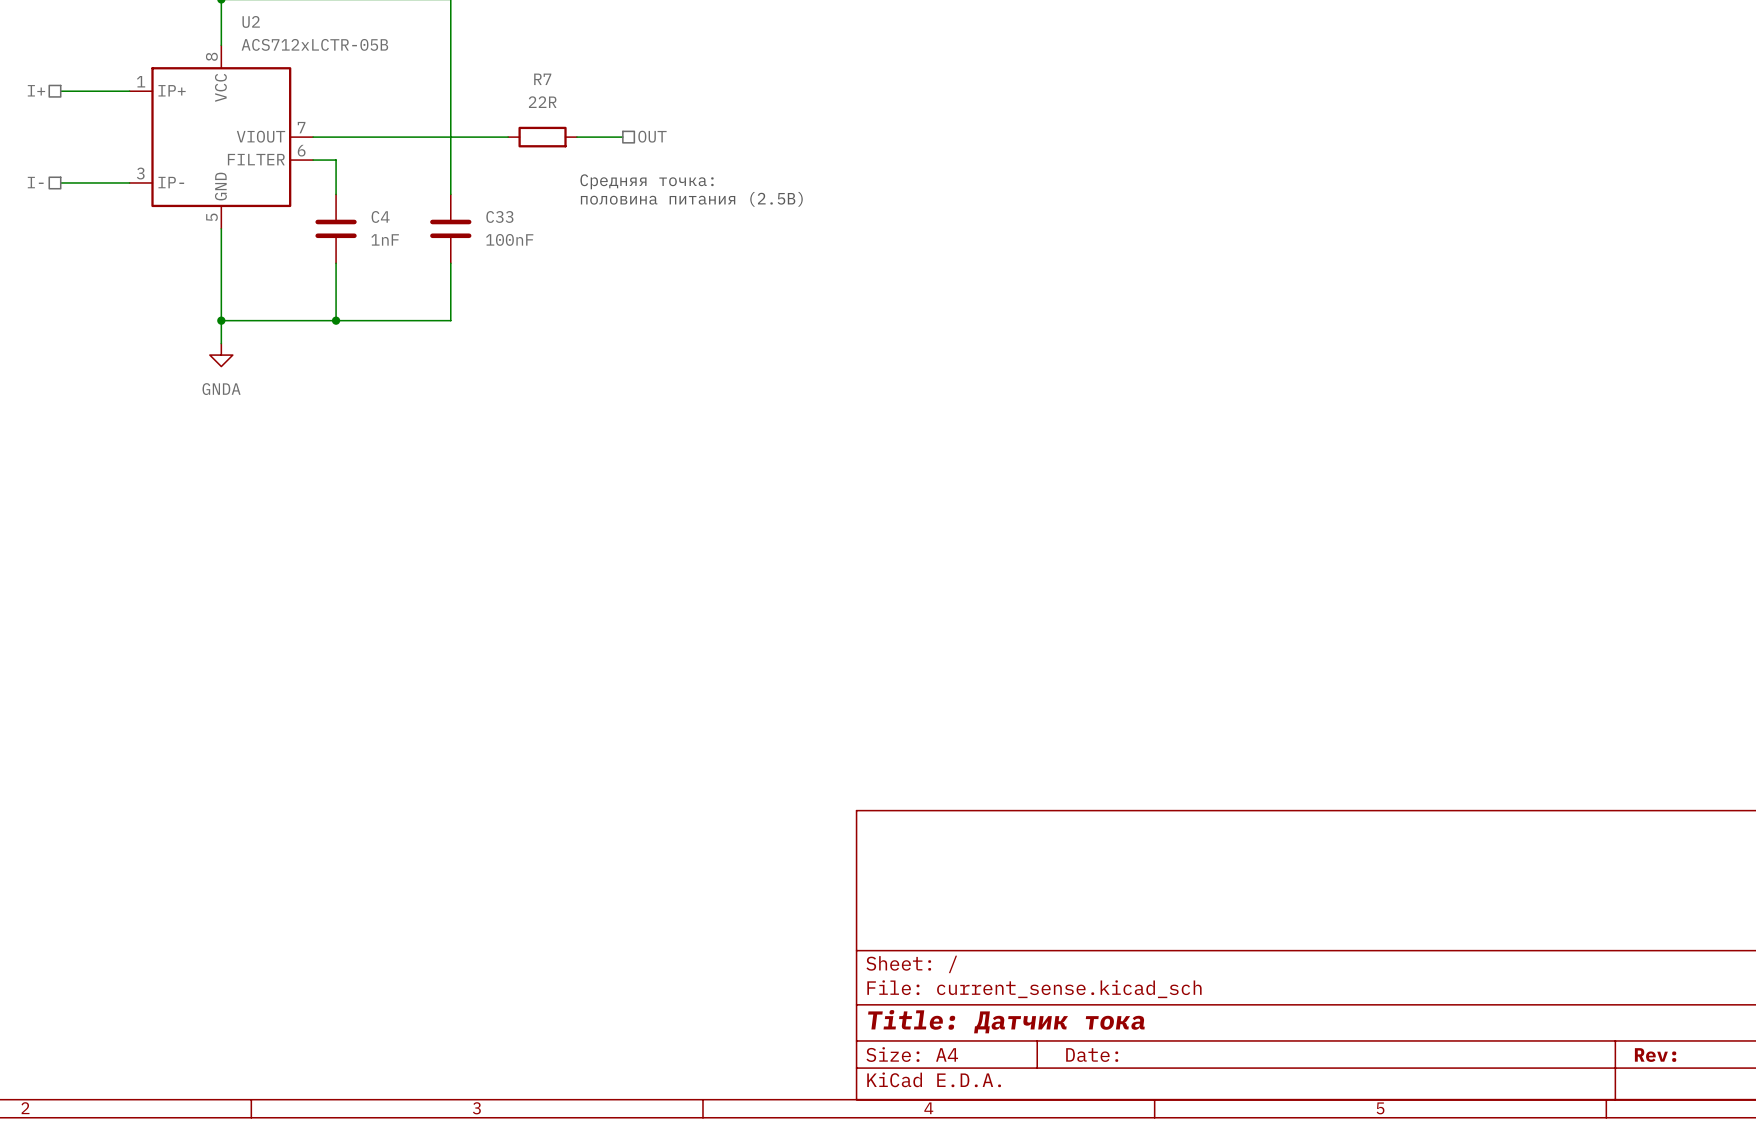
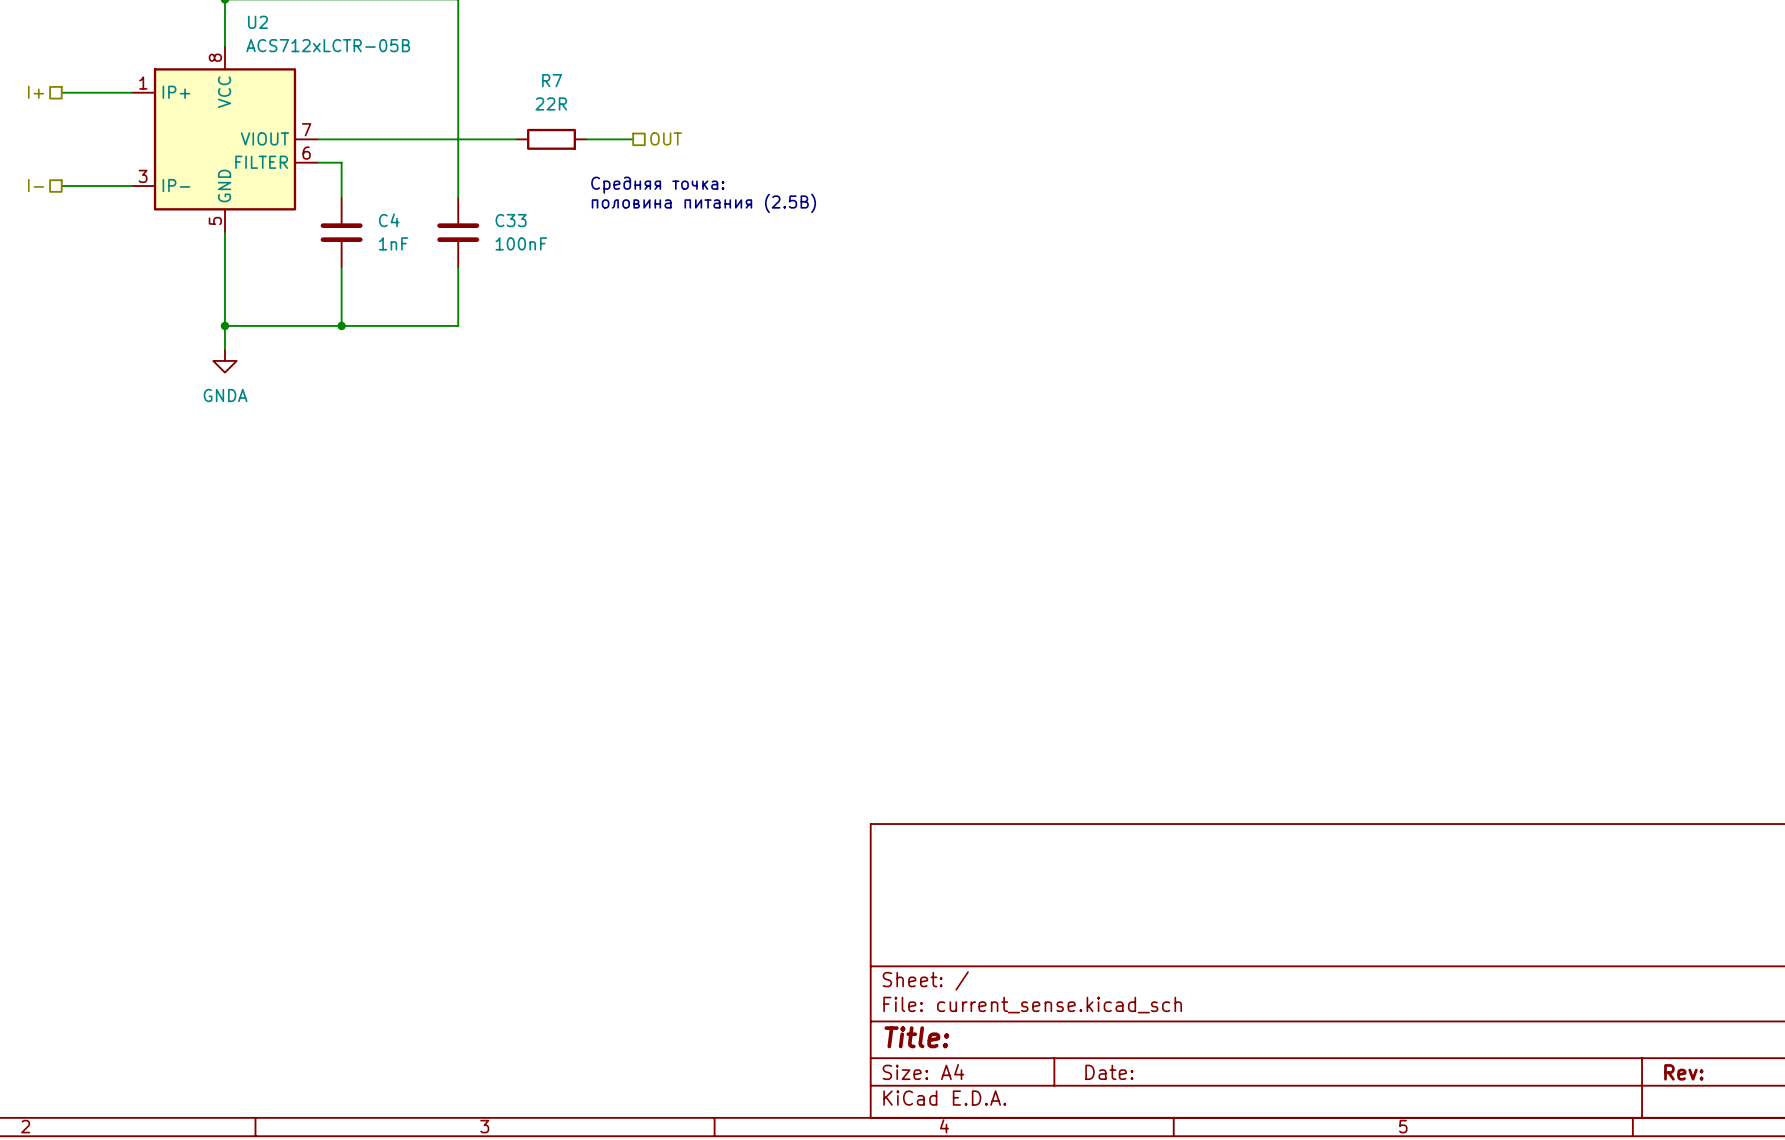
title block: Title: Датчик тока (1006, 1021) -> Title: (916, 1037)

